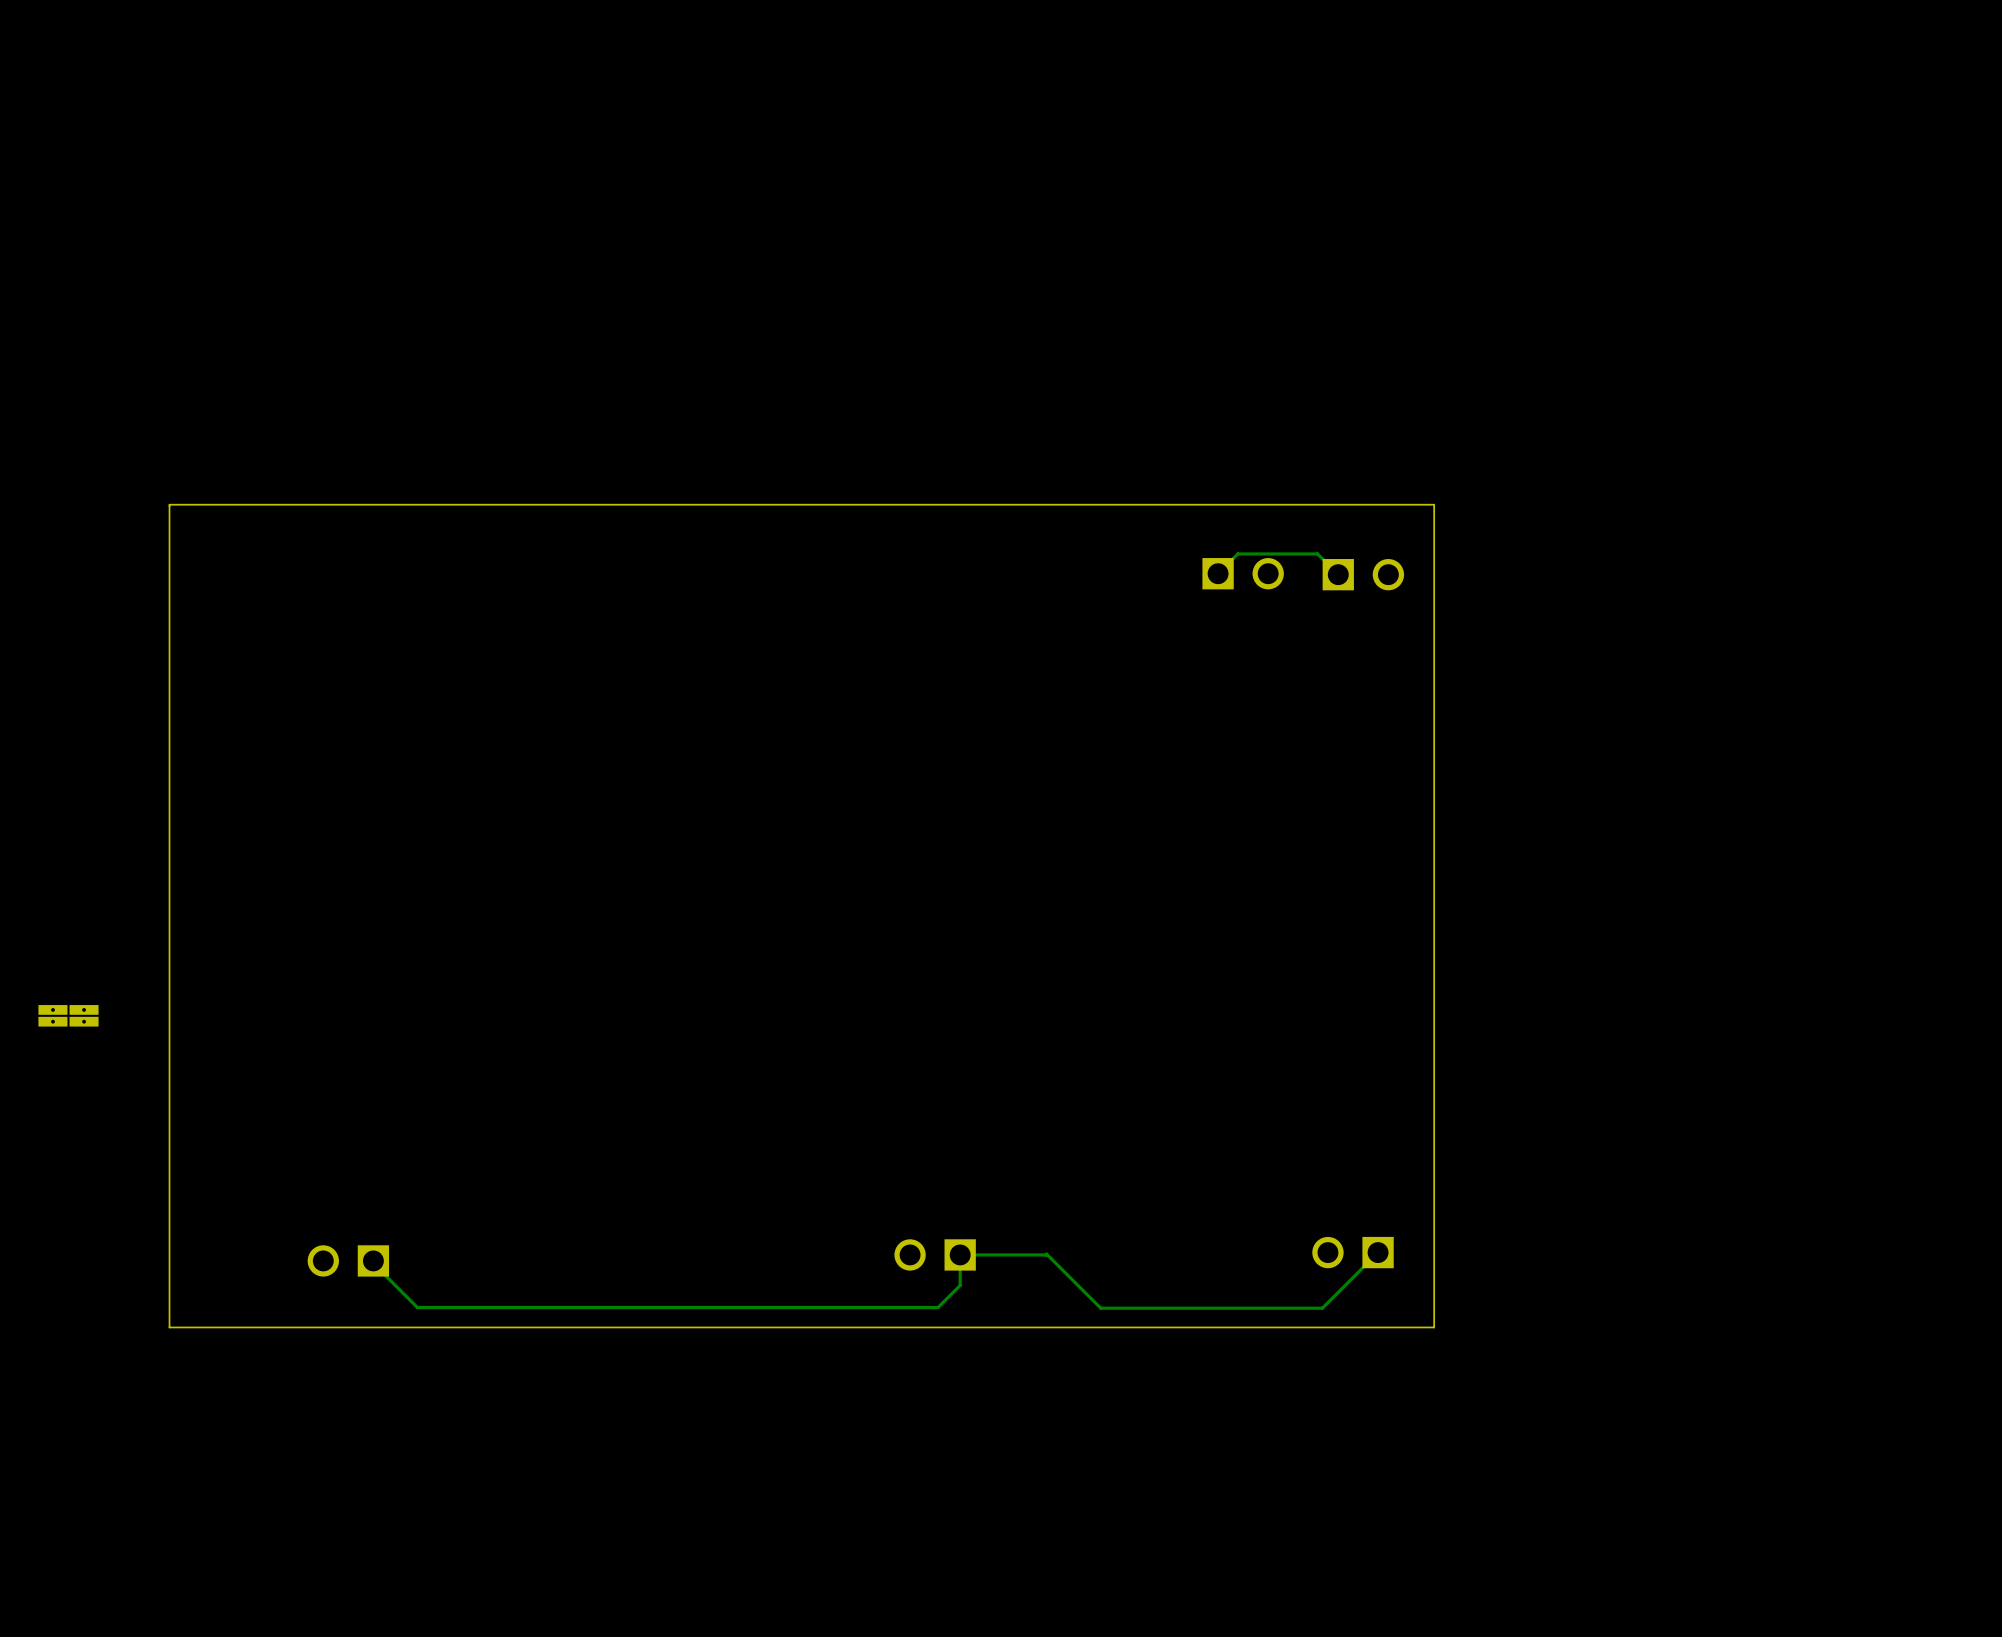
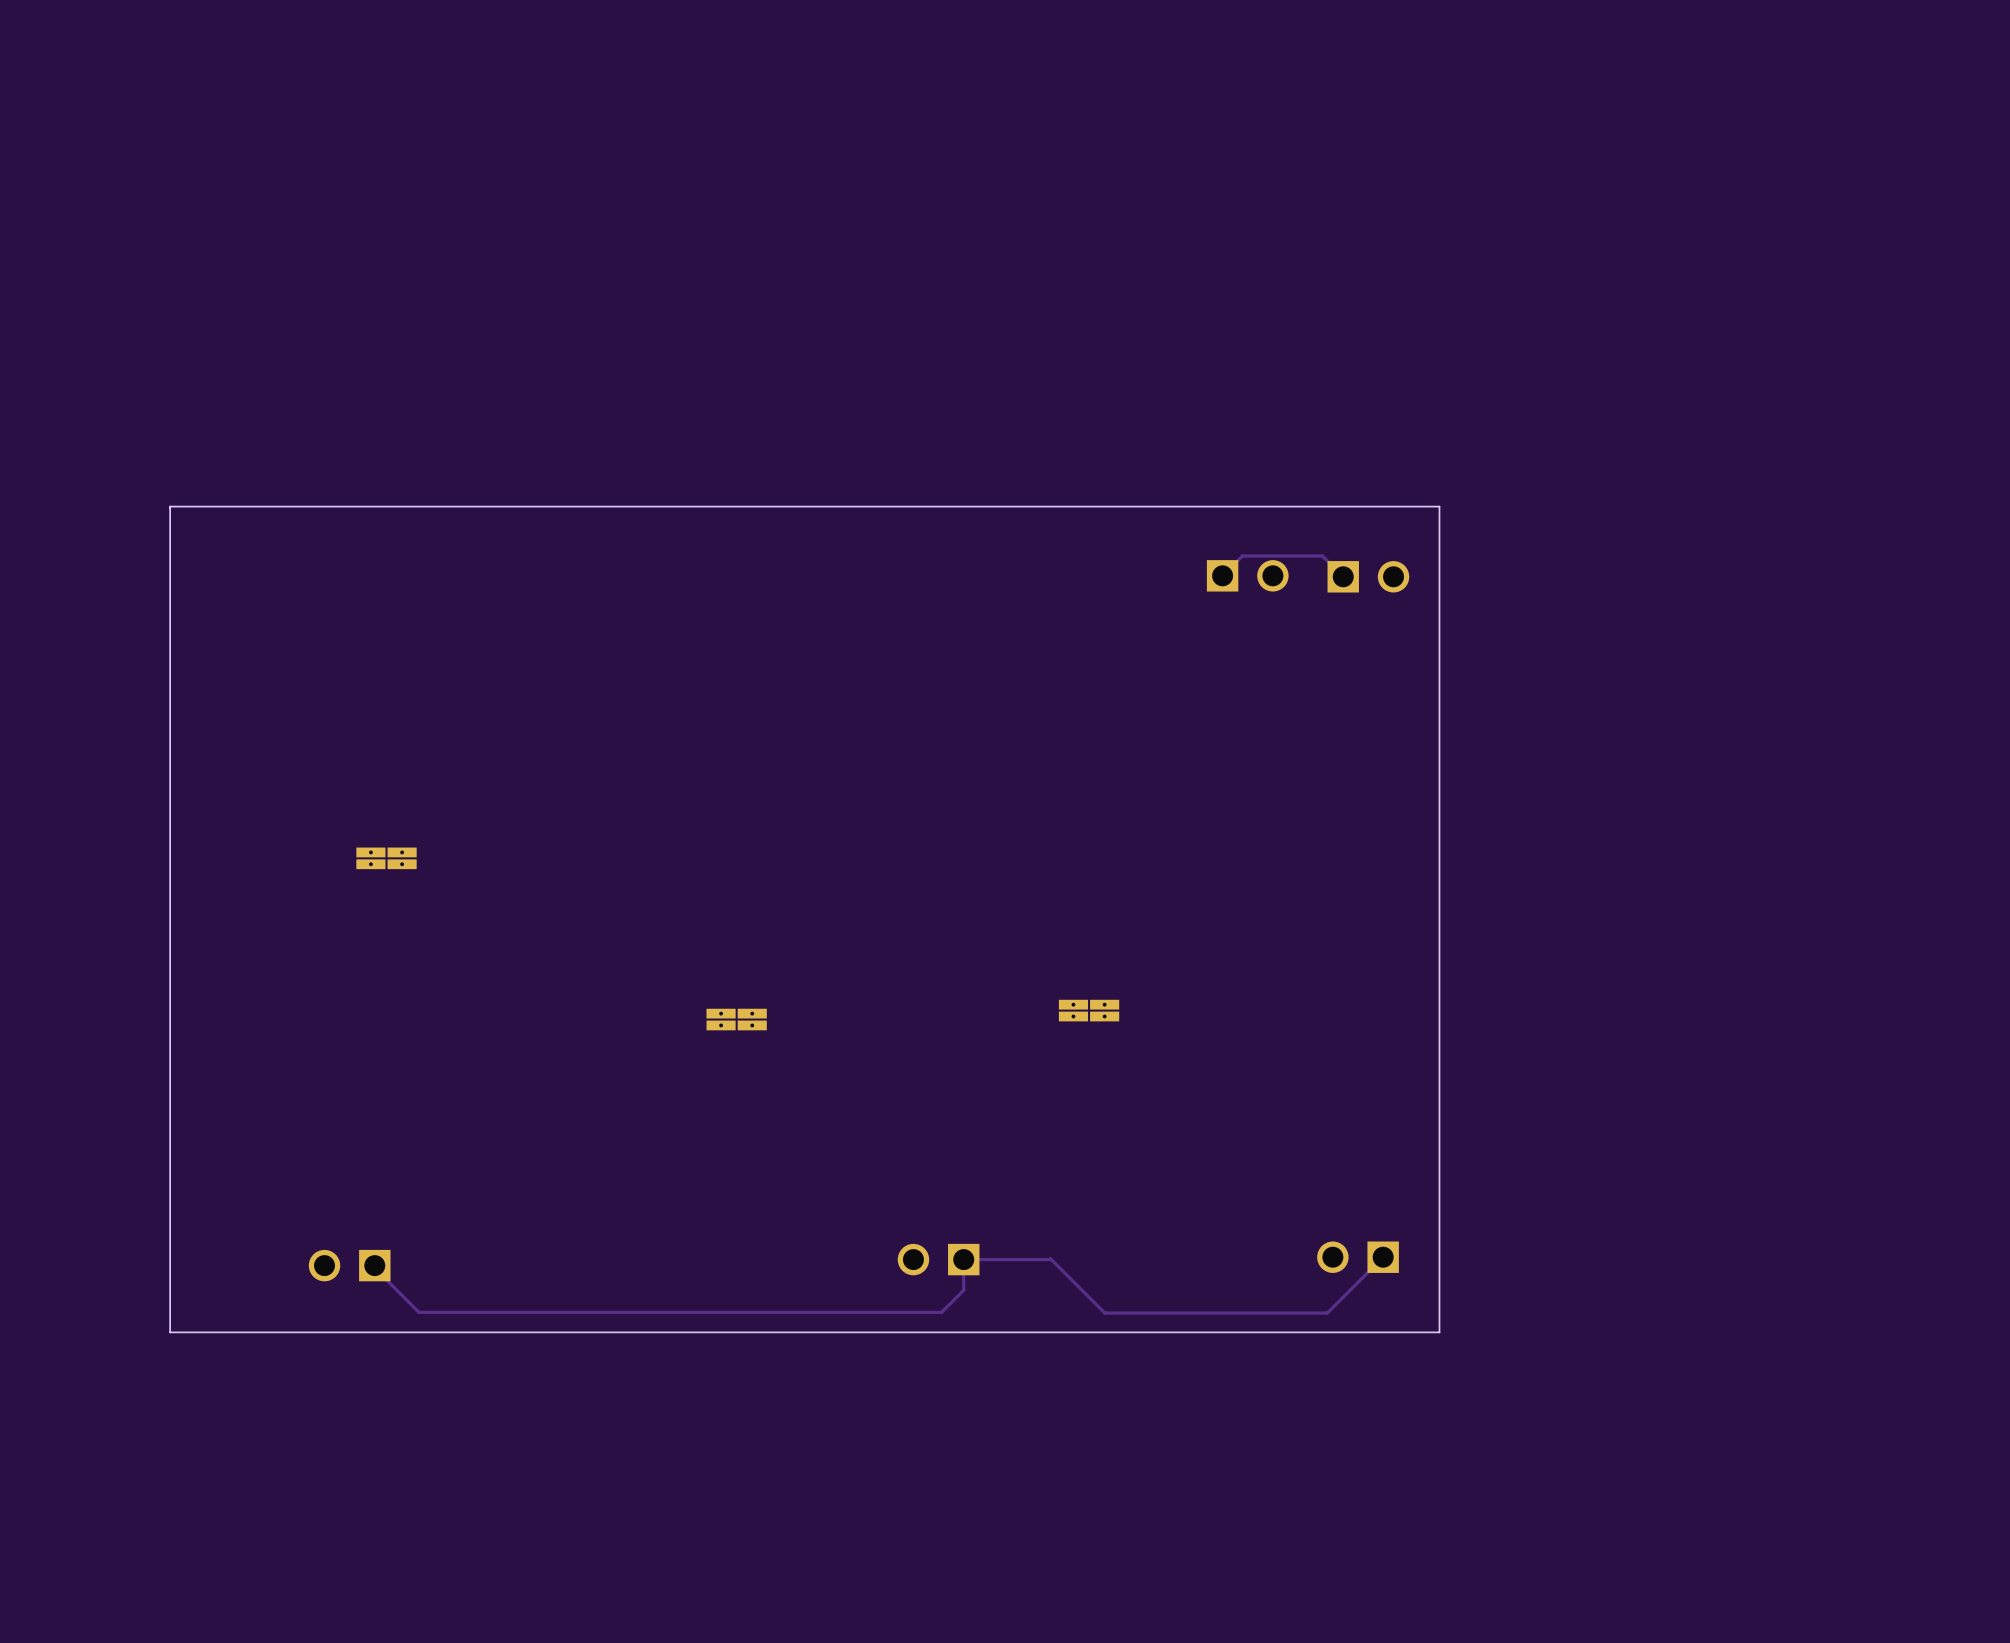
part: none -> (386, 858)
part: none -> (1089, 1010)
part: (68, 1015) -> none
part: none -> (736, 1019)

